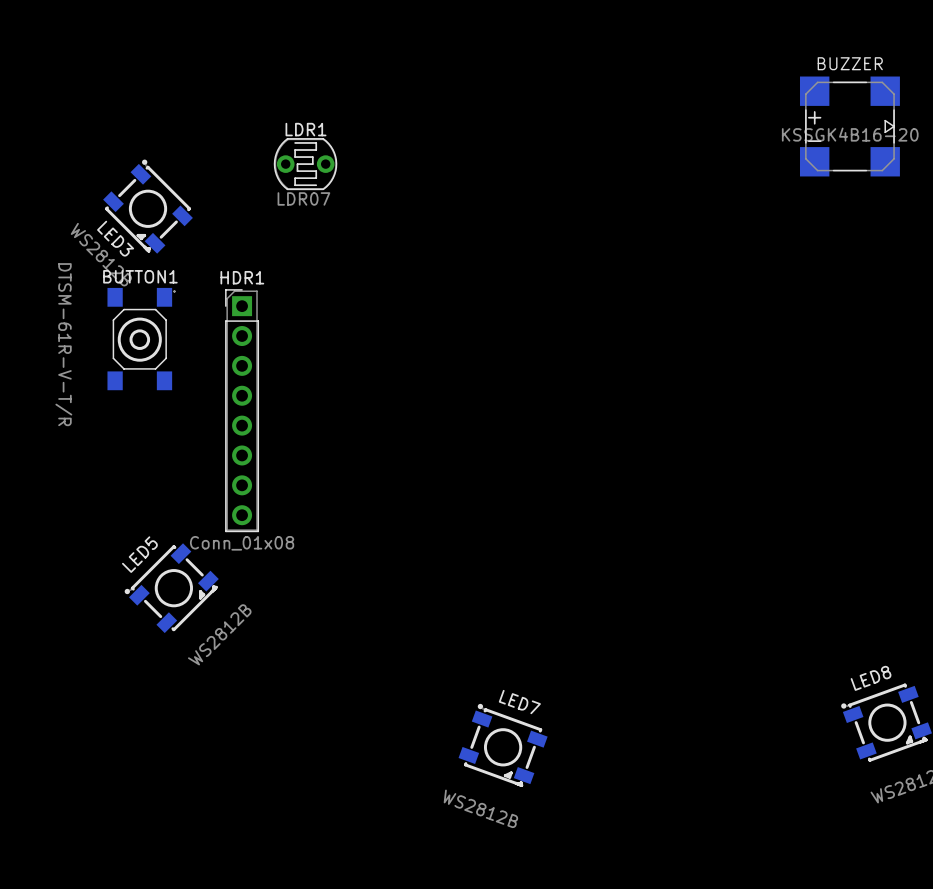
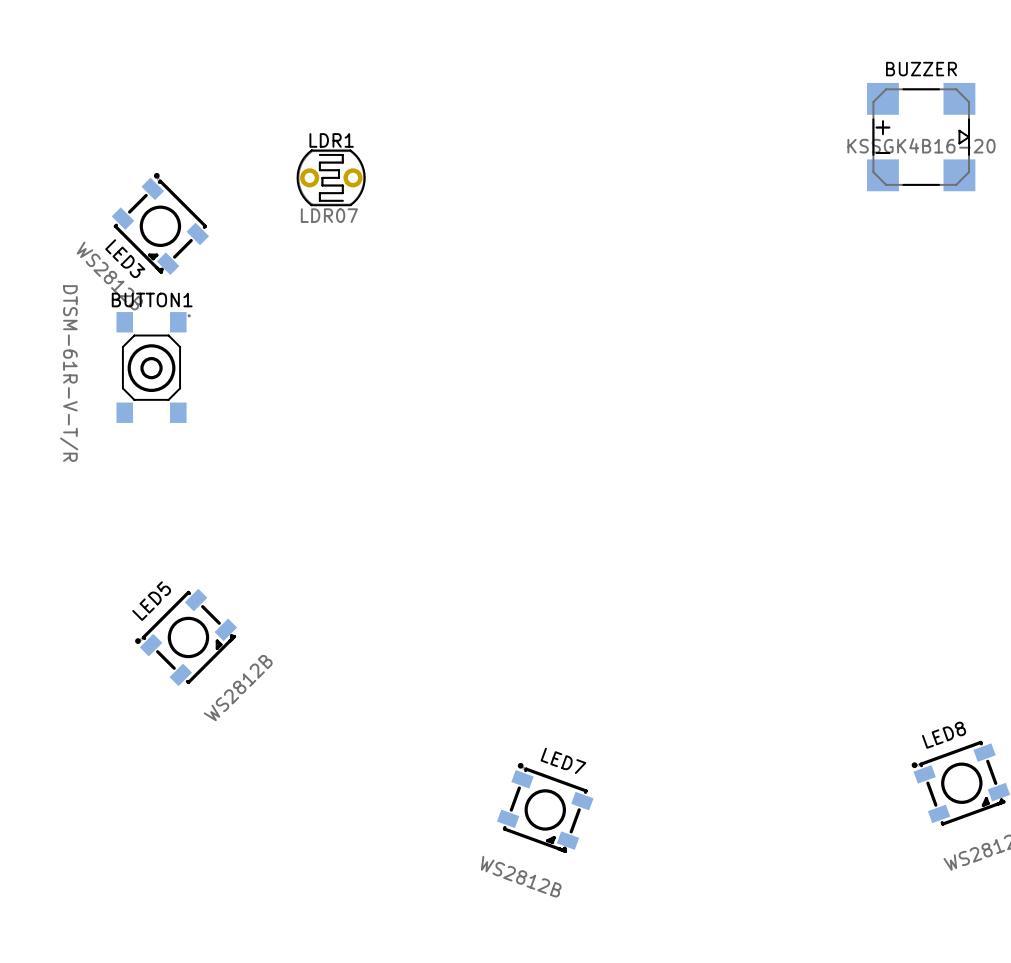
HDR1: Conn_01x08 (242, 410) -> none

